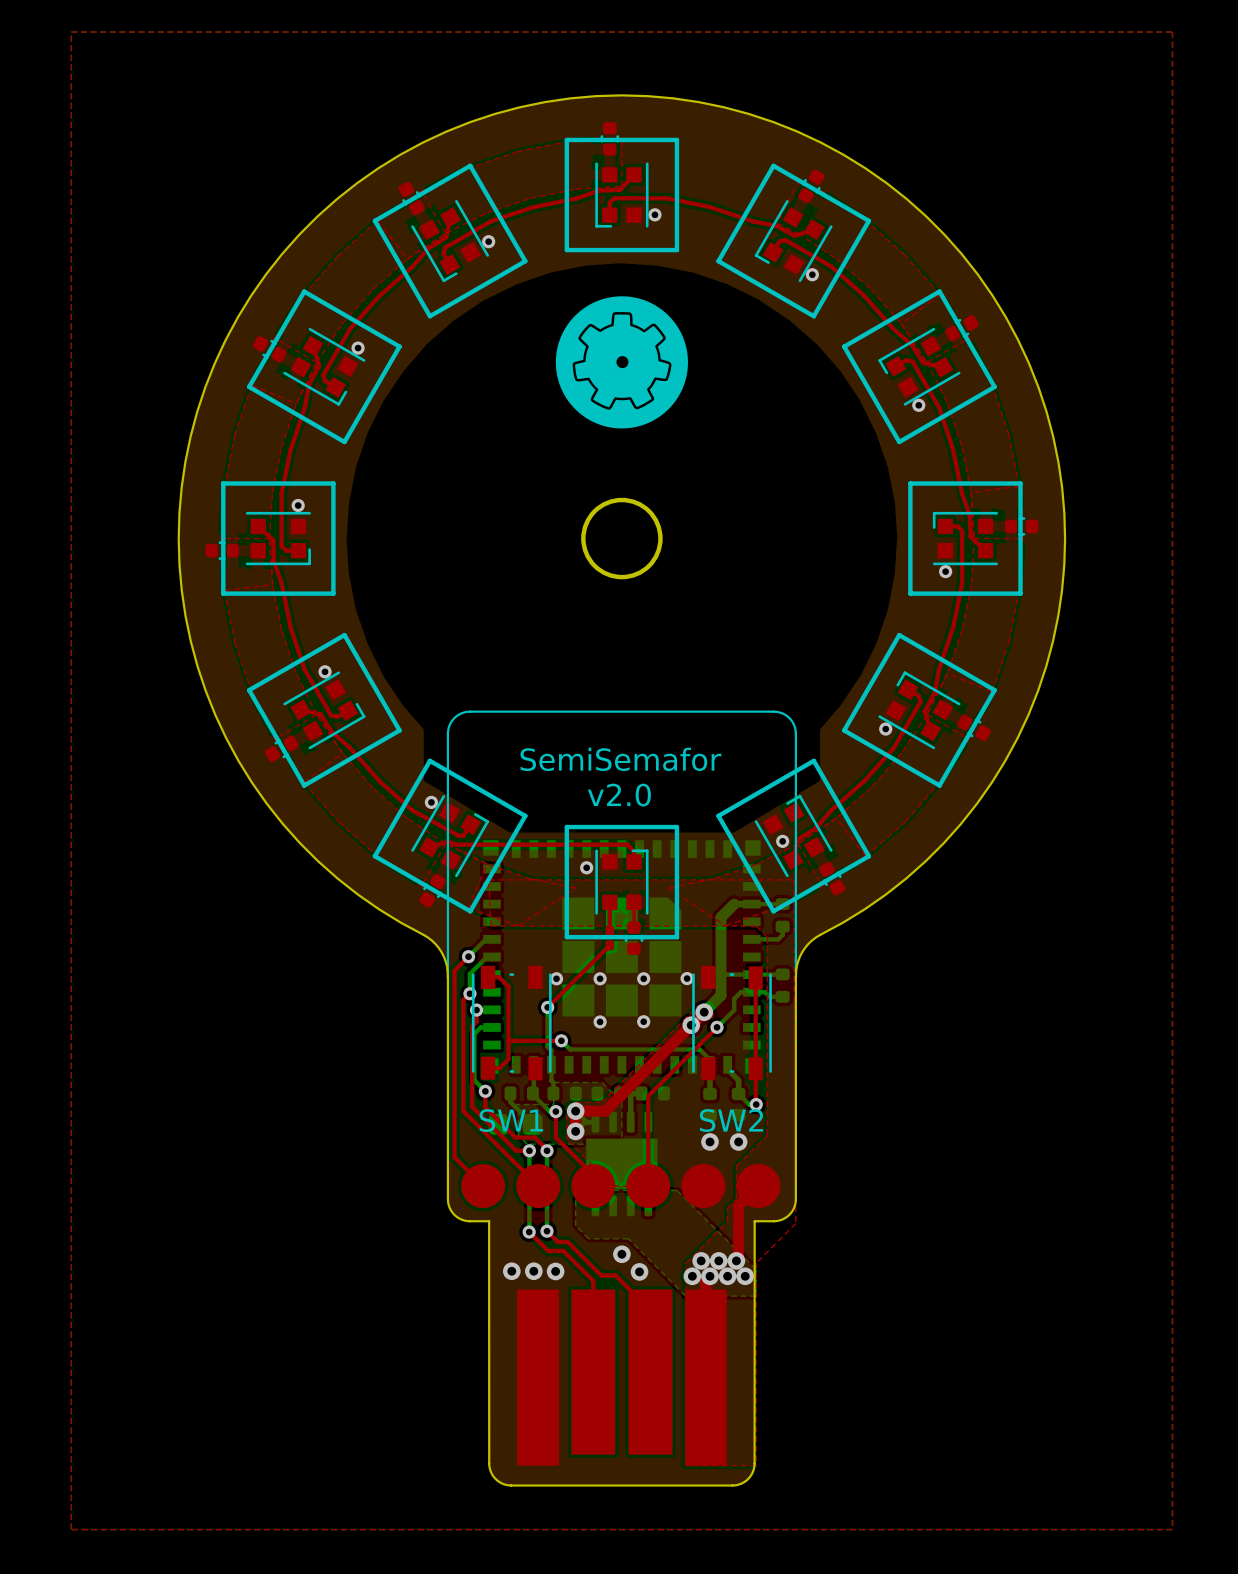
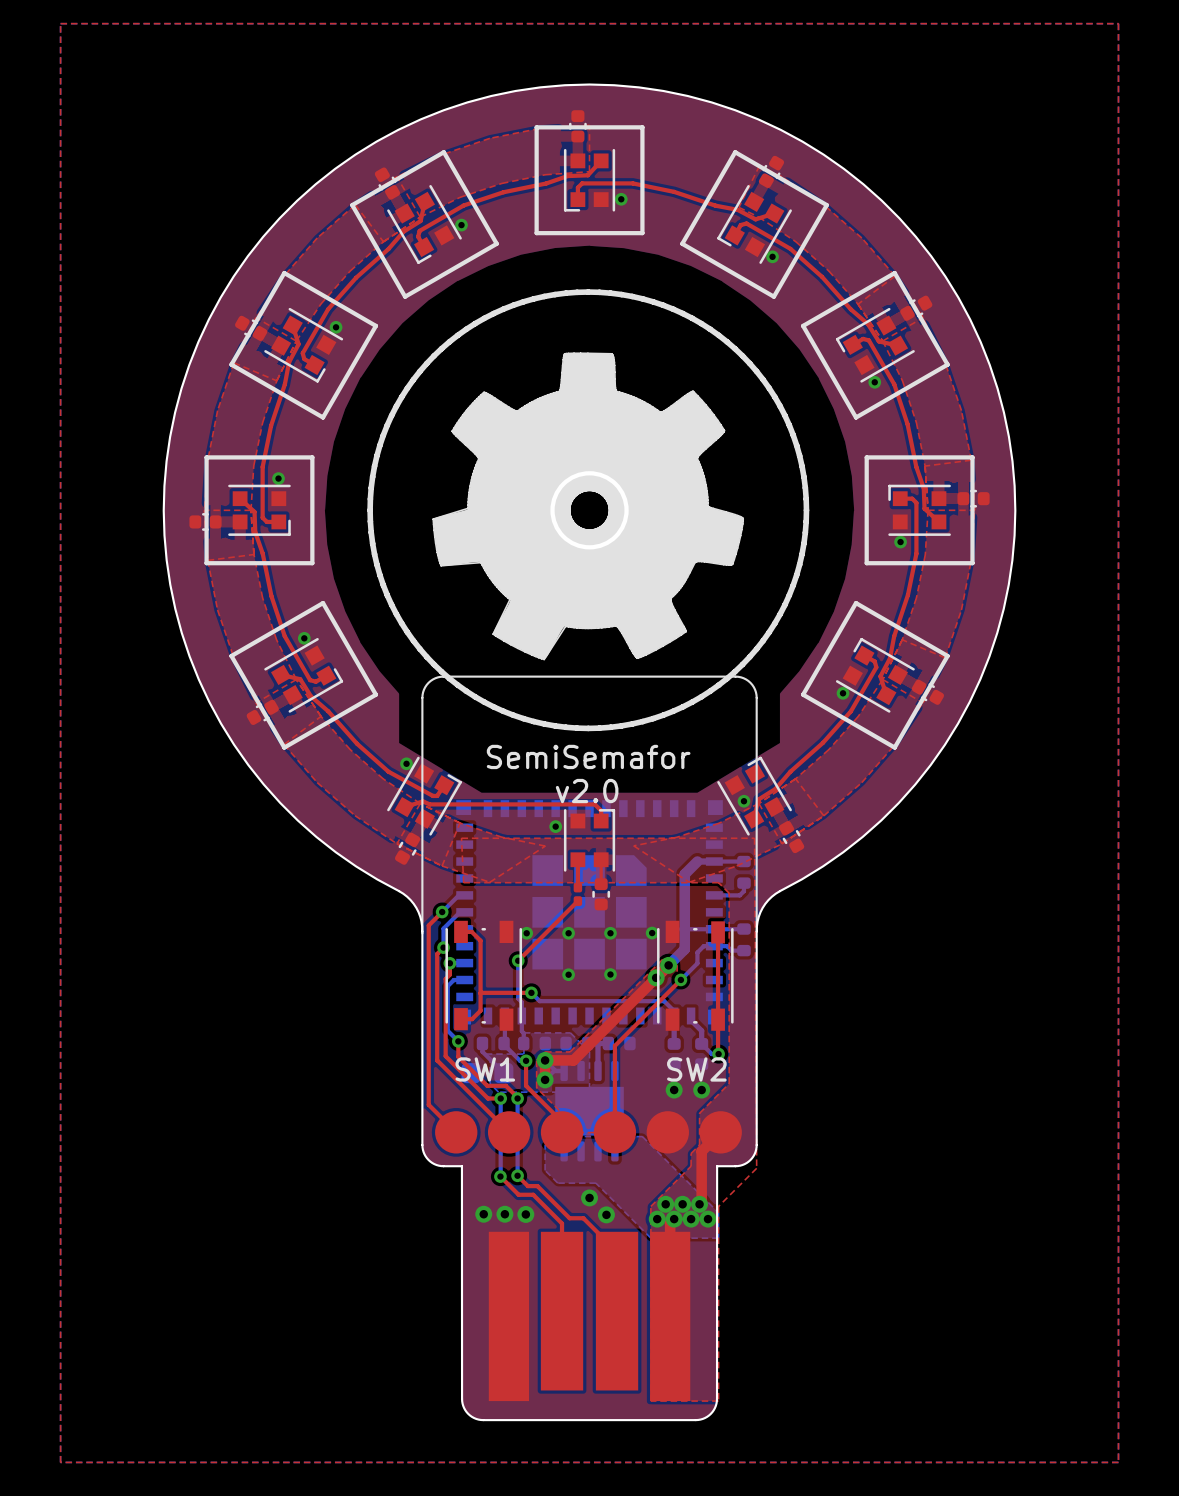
drawing: [555, 296, 688, 429] -> none
line: none -> (588, 292) (544, 296) (503, 309) (466, 329) (434, 355) (407, 388) (387, 425) (374, 466) (370, 510) (374, 554) (387, 595) (407, 632) (434, 664) (466, 691) (503, 711) (544, 723) (588, 728) (632, 723) (673, 711) (710, 691) (742, 664) (769, 632) (789, 595) (802, 554) (806, 510) (802, 466) (789, 425) (769, 388) (742, 355) (710, 329) (673, 309) (632, 296) (588, 292)
drawing: none -> [433, 353, 744, 660]
line: none -> (564, 353) (612, 354) (616, 391)
line: none -> (564, 354) (559, 391)
line: none -> (559, 391) (537, 399) (517, 411)
line: none -> (616, 391) (639, 399) (660, 412)
line: none -> (693, 391) (660, 412)
line: none -> (693, 391) (724, 430)
line: none -> (483, 392) (517, 411)
line: none -> (483, 392) (466, 410) (452, 430)
line: none -> (724, 430) (697, 458)
line: none -> (452, 431) (478, 458)
line: none -> (478, 458) (470, 483) (468, 508) (433, 519) (433, 524) (441, 565) (480, 562) (493, 582) (509, 599) (493, 634) (517, 648) (544, 659) (565, 626) (588, 628) (616, 626) (637, 658) (655, 649) (685, 631)
line: none -> (697, 458) (705, 481) (708, 506)
line: none -> (587, 490) (595, 491) (602, 494) (609, 508) (608, 516) (604, 522) (591, 530) (583, 529) (576, 525) (569, 512) (570, 504) (574, 497) (587, 490)
line: none -> (708, 506) (743, 518)
line: none -> (743, 519) (732, 564) (695, 561) (682, 586) (670, 598) (685, 631)
text: SemiSemafor (620, 759) -> none
line: (429, 760) (525, 815) (470, 911) (374, 856) (429, 760) -> none
line: (813, 760) (718, 815) (773, 911) (868, 856) (813, 760) -> none
text: v2.0 (619, 795) -> SemiSemafor (588, 756)
line: (566, 827) (676, 827) (676, 937) (566, 937) (566, 827) -> none
text: none -> v2.0 (587, 791)

